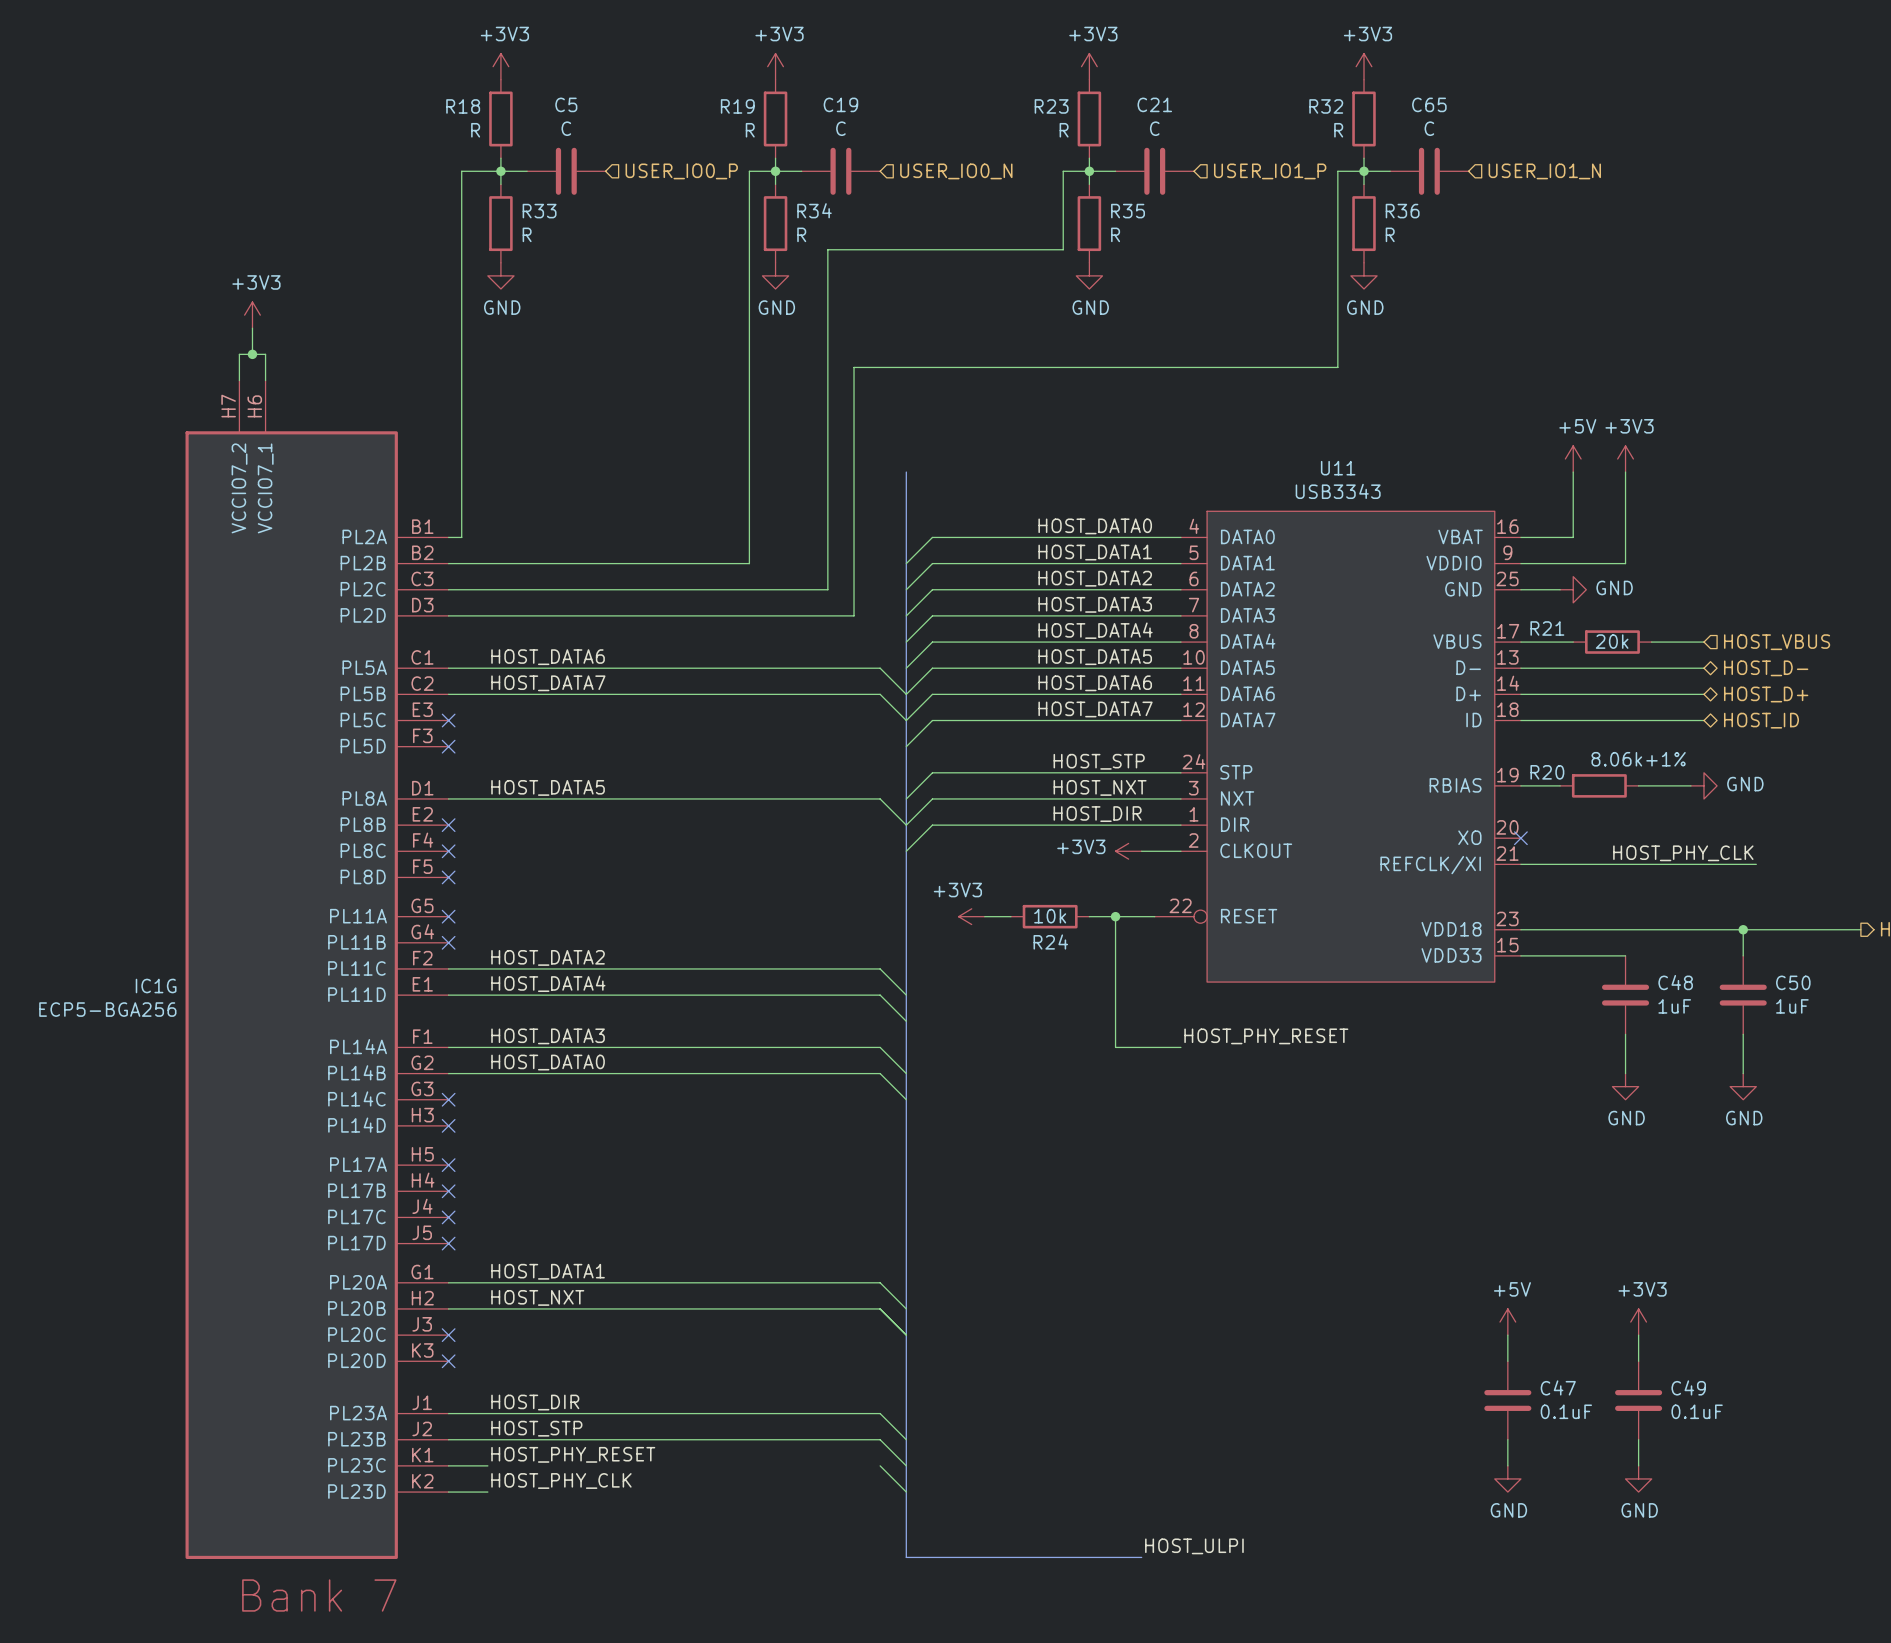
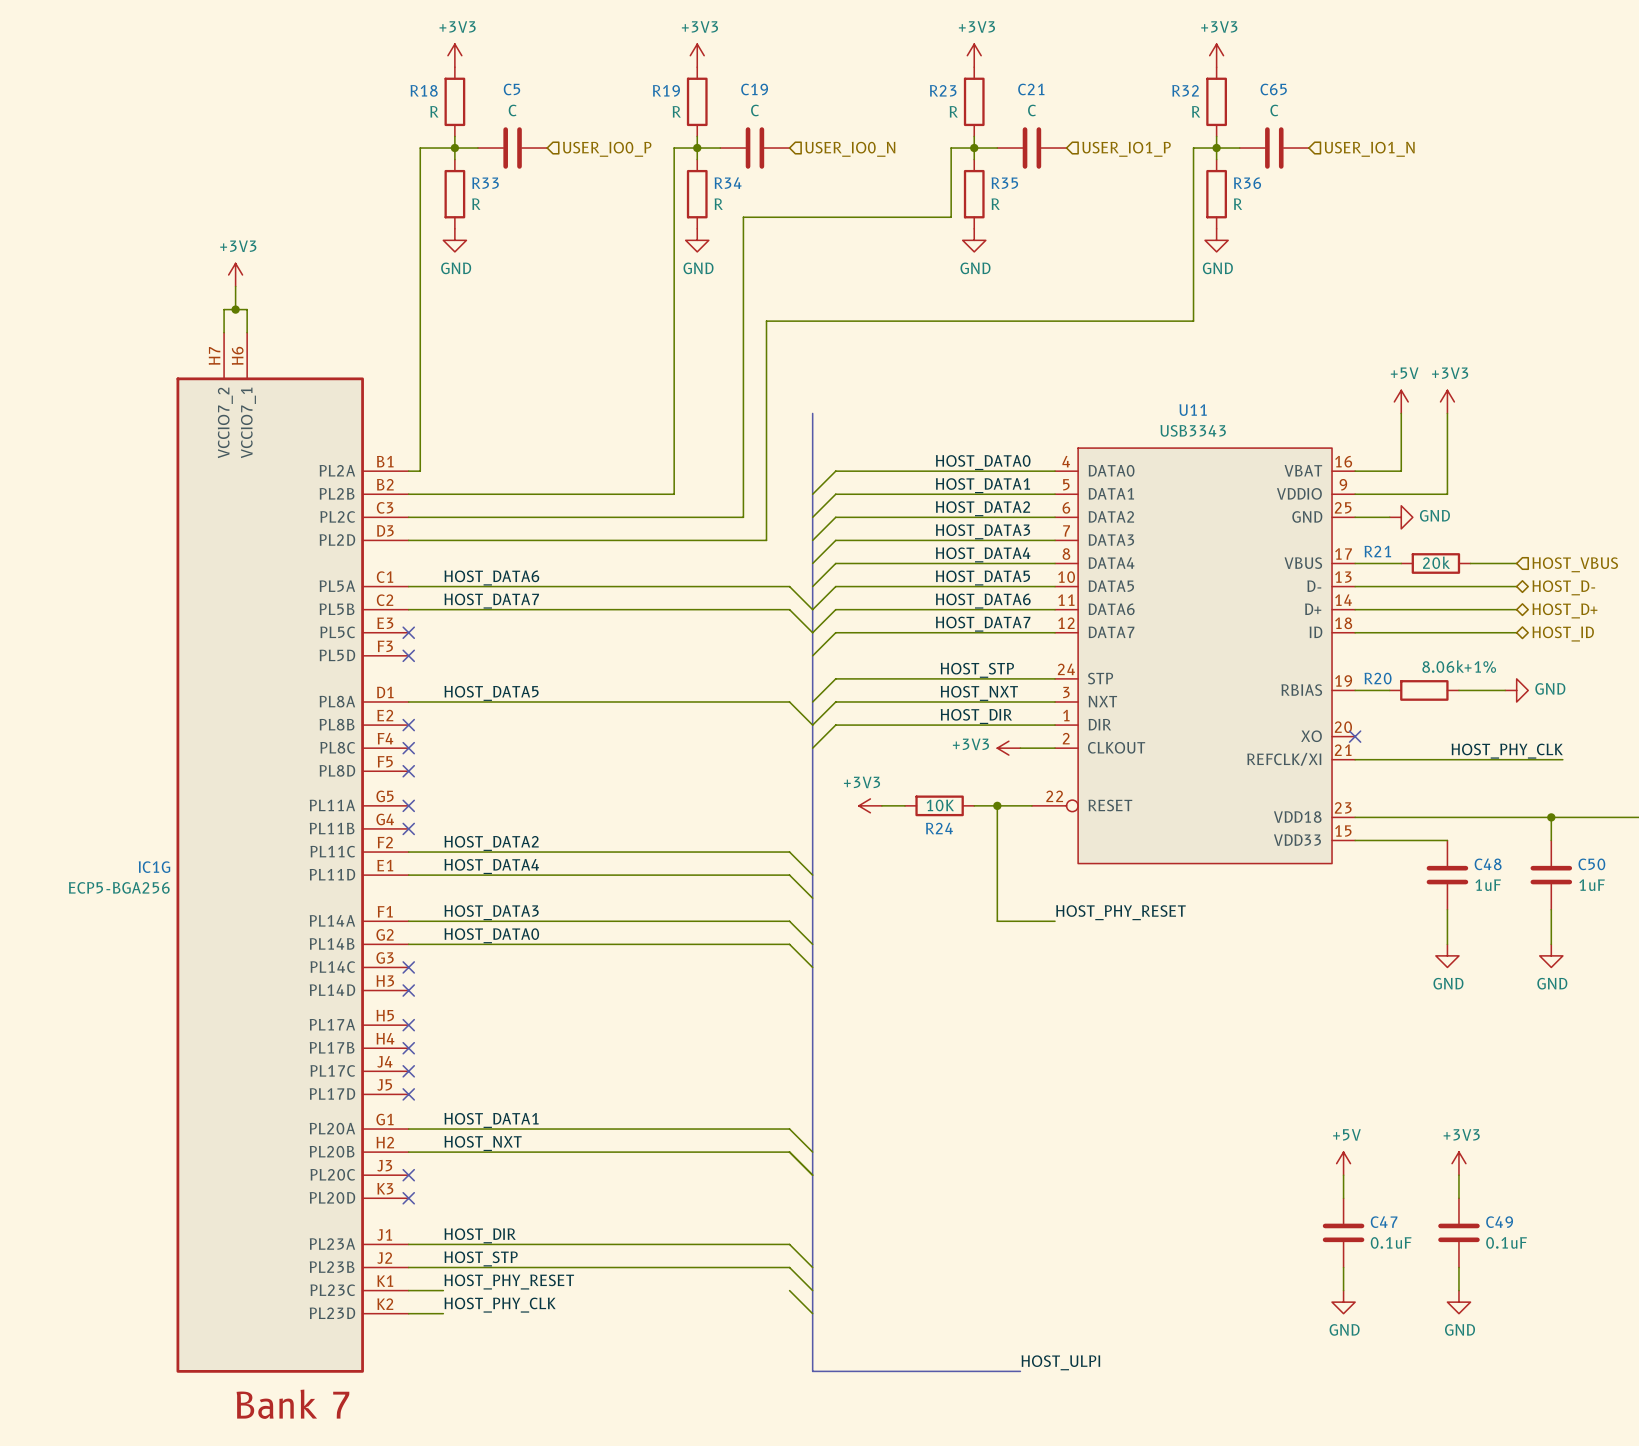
R24 value: 10k (1050, 916) -> 10K (940, 805)

